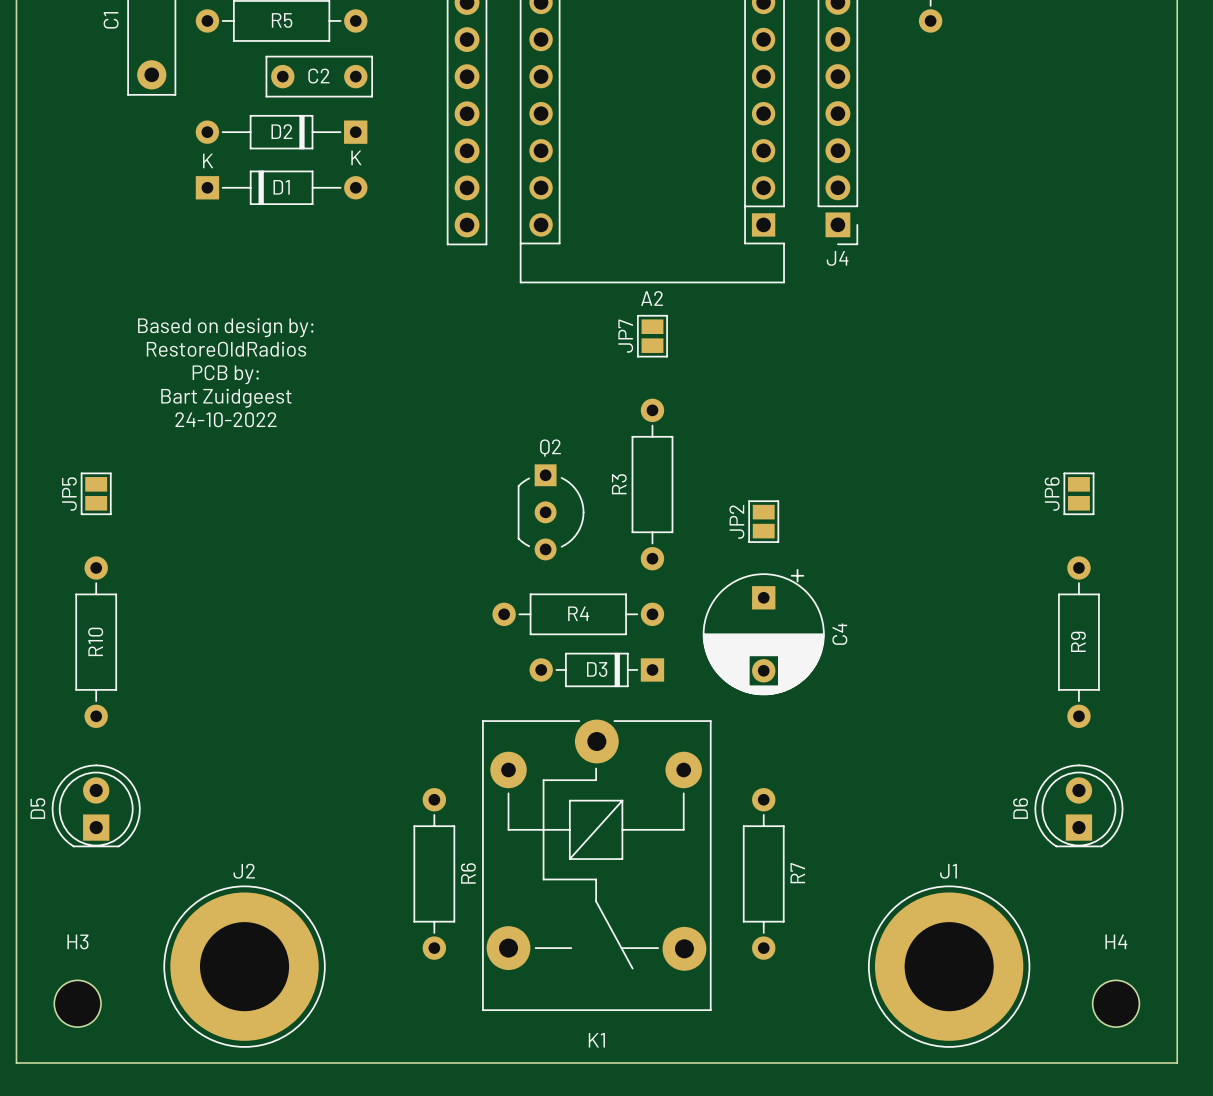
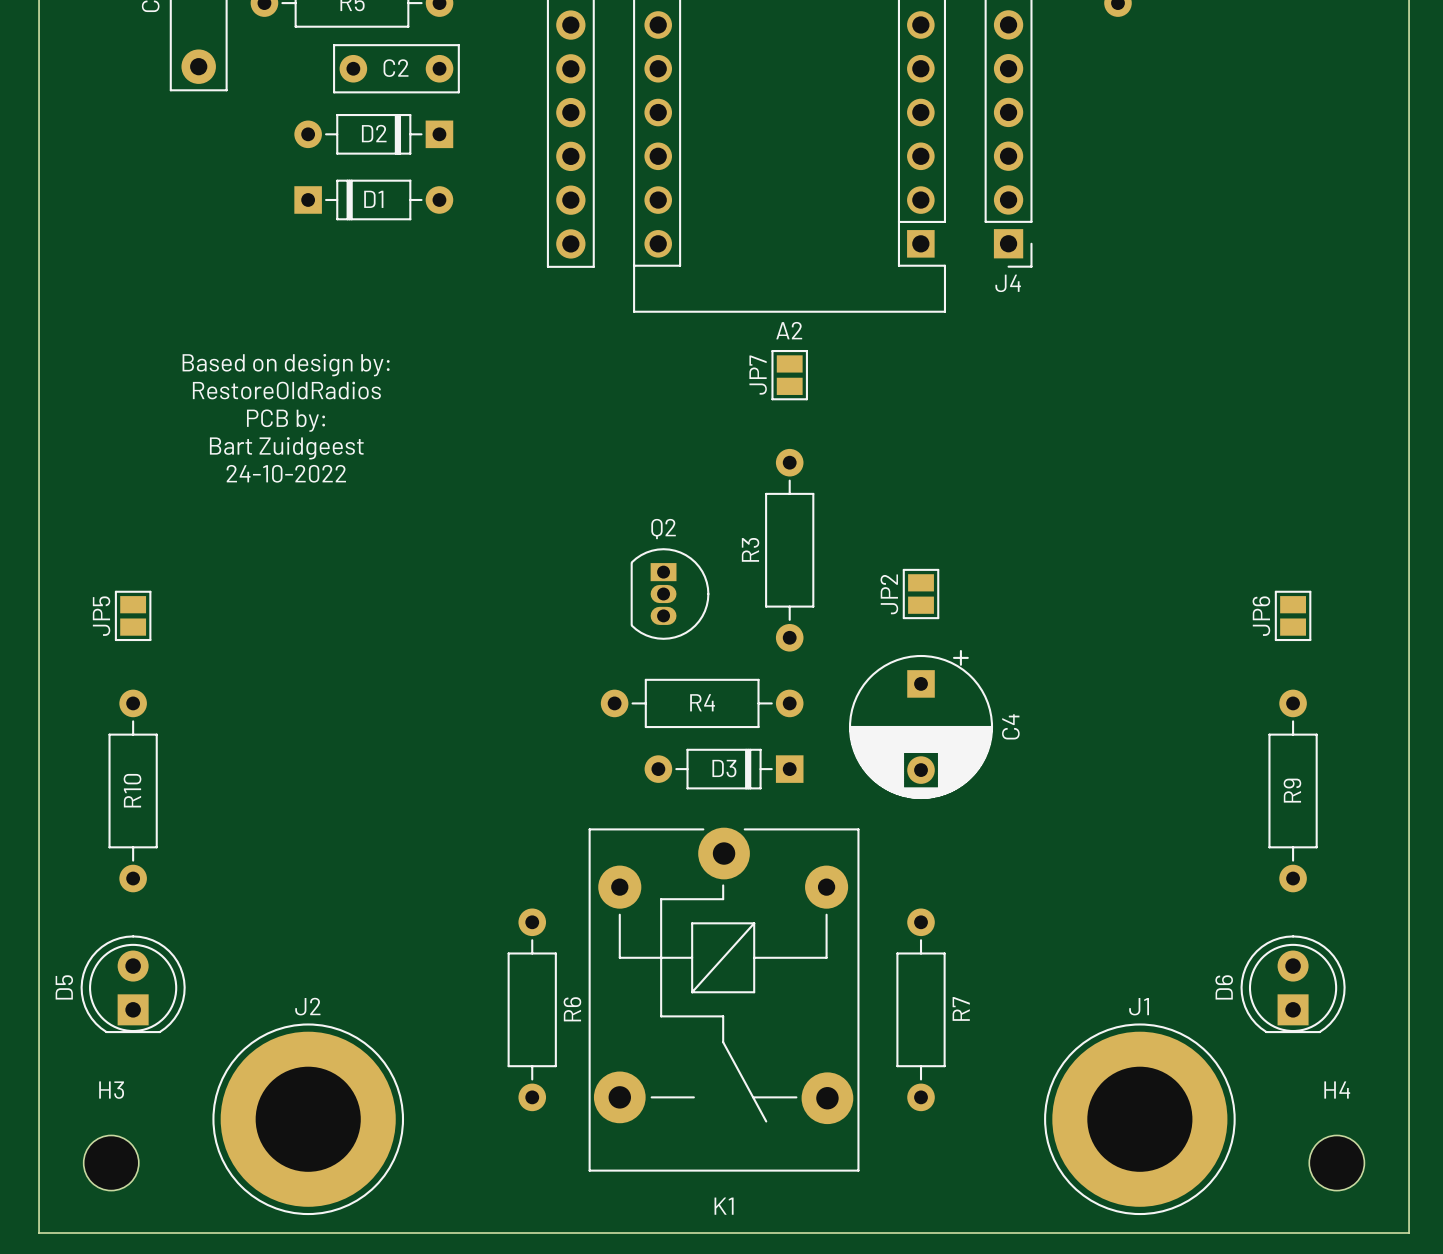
D2 footprint: [195, 114, 368, 150] -> [294, 113, 454, 155]
D1 footprint: [195, 170, 368, 206] -> [294, 179, 454, 221]
Q2 footprint: [517, 464, 585, 561] -> [630, 548, 710, 640]
JP5 position: (96, 493) -> (133, 615)
JP6 position: (1078, 493) -> (1293, 615)
R10 position: (96, 642) -> (133, 790)
R9 position: (1078, 642) -> (1293, 790)
D5 position: (96, 805) -> (133, 984)
D6 position: (1078, 805) -> (1293, 984)

